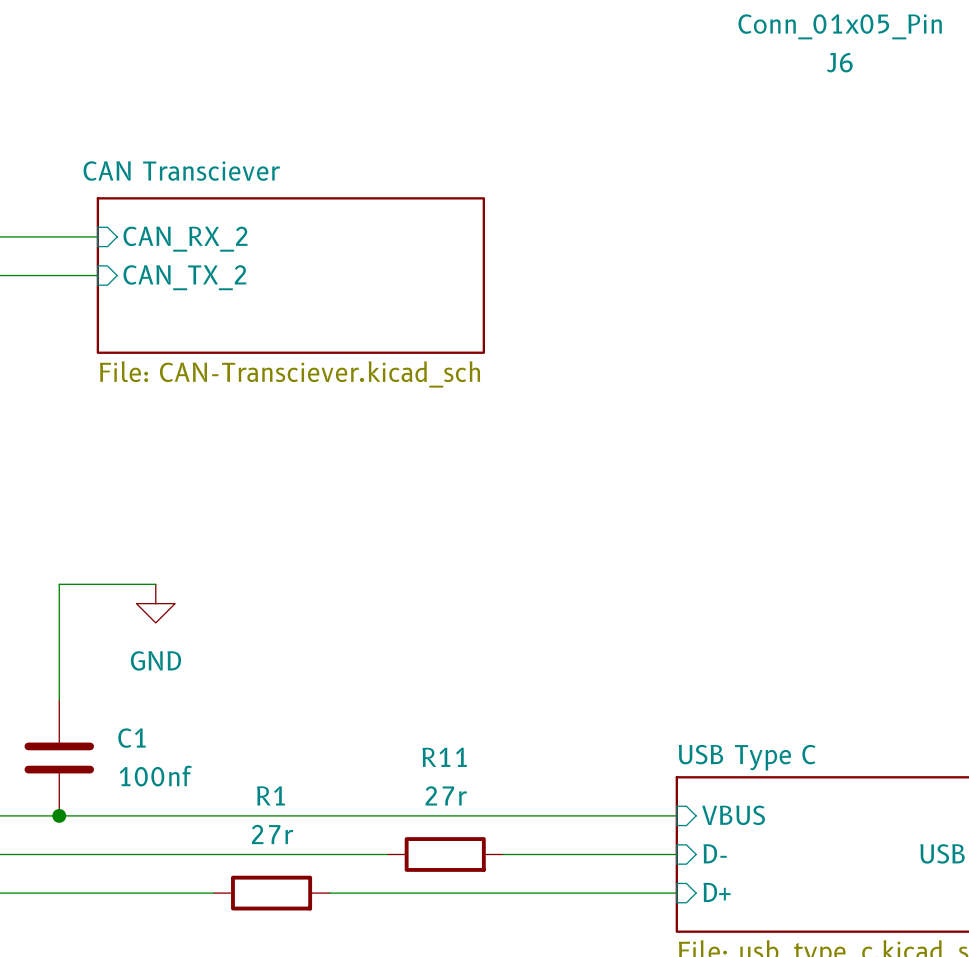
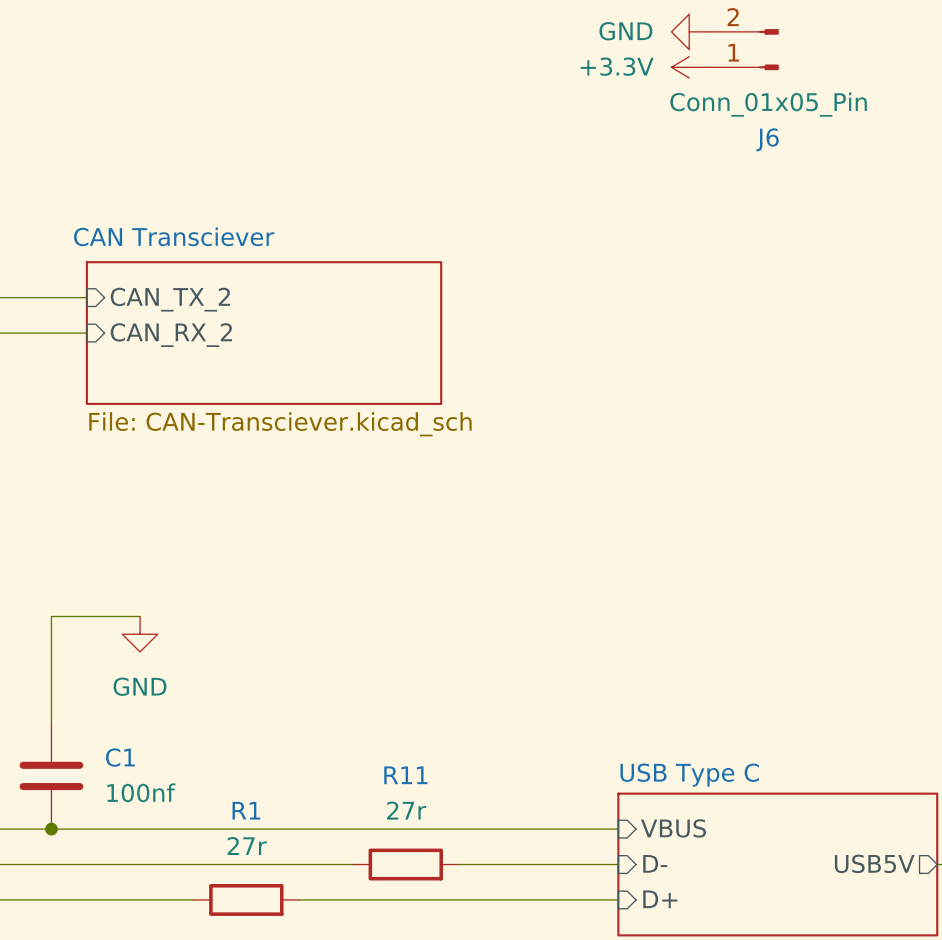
sheet pin: CAN_RX_2 (185, 239) -> CAN_TX_2 (170, 299)
sheet pin: CAN_TX_2 (184, 277) -> CAN_RX_2 (171, 335)

